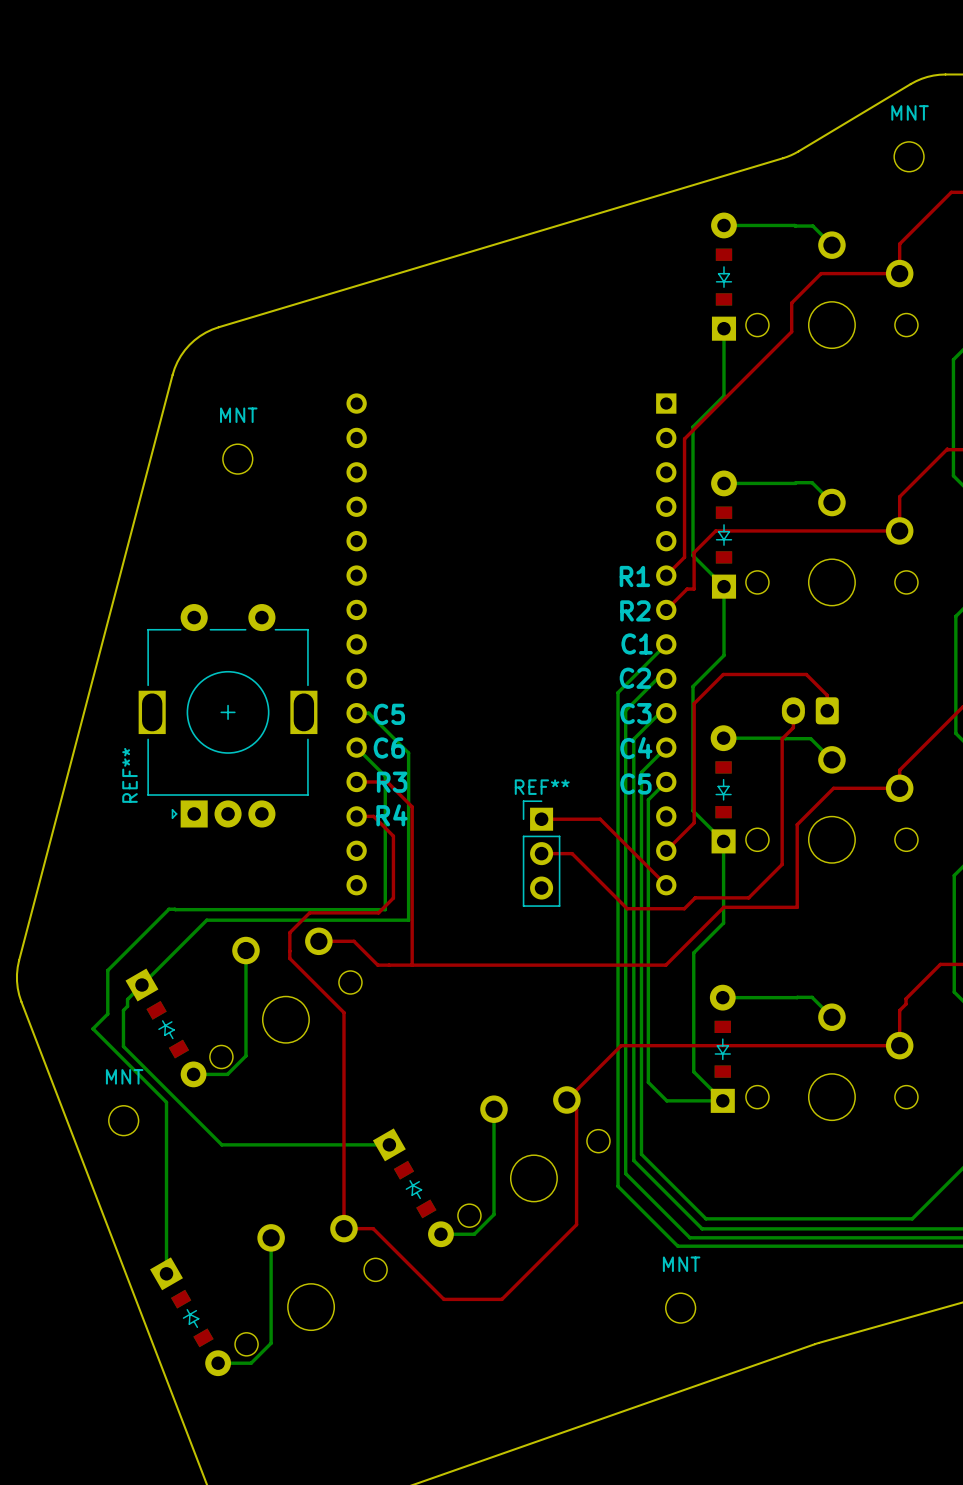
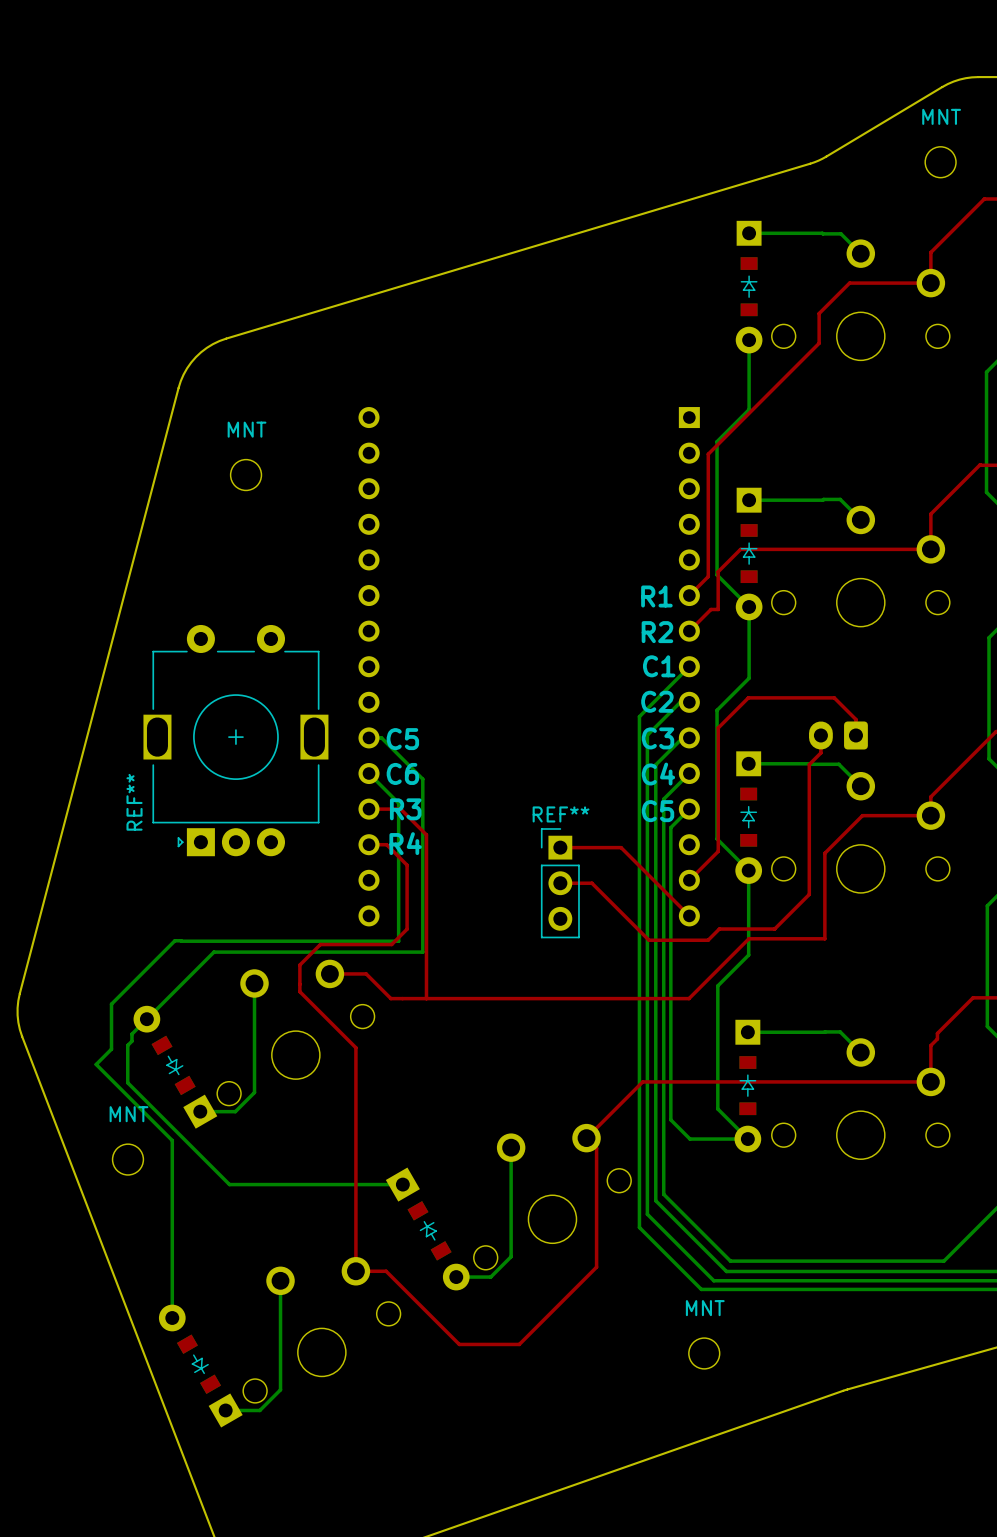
part rotation: 0° (723, 276) -> 180° (749, 287)
part rotation: 0° (724, 534) -> 180° (749, 554)
part rotation: 0° (723, 789) -> 180° (748, 817)
part rotation: 0° (166, 1027) -> 180° (175, 1067)
part rotation: 0° (722, 1048) -> 180° (747, 1086)
part rotation: 0° (190, 1316) -> 180° (200, 1366)

